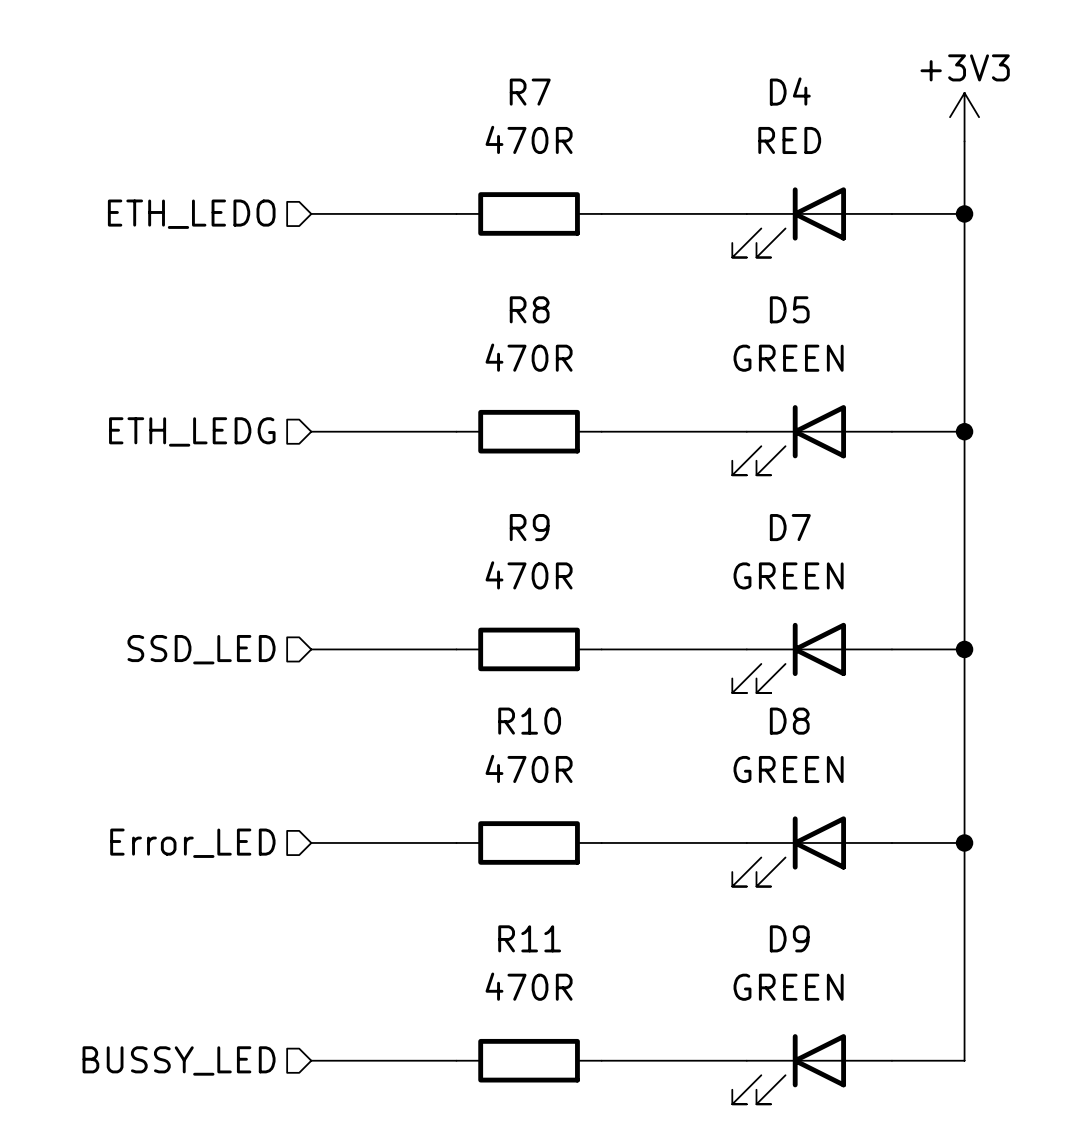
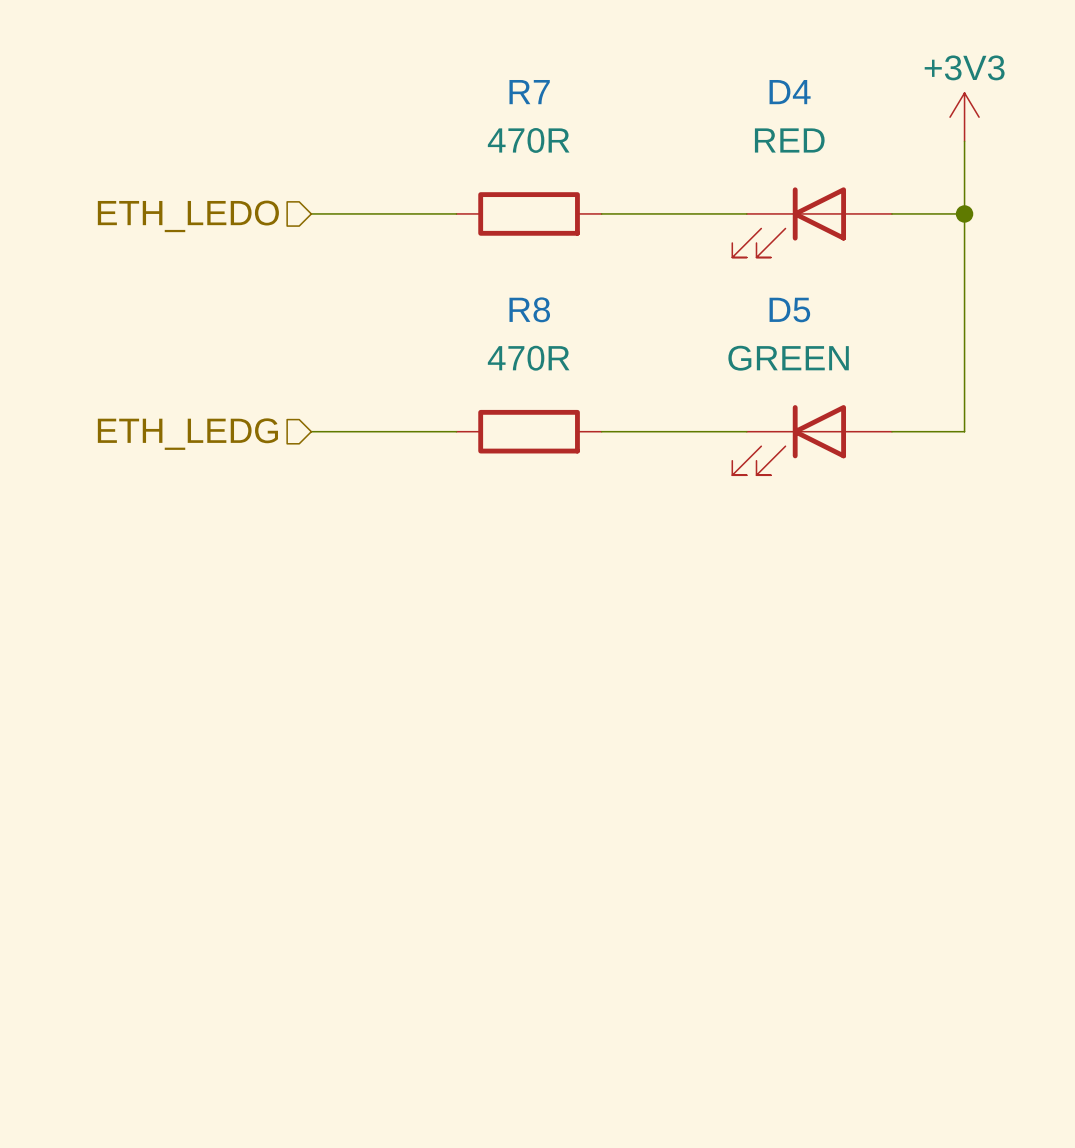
wire: (964, 431) (964, 1060) (891, 1060) -> none
junction: (964, 431) -> none
hierarchical label: SSD_LED (201, 649) -> none
wire: (311, 649) (456, 649) -> none
R9: 470R (529, 649) -> none
wire: (601, 649) (746, 649) -> none
wire: (891, 649) (964, 649) -> none
junction: (964, 649) -> none
D7: GREEN (812, 657) -> none
wire: (311, 842) (456, 842) -> none
R10: 470R (529, 842) -> none
wire: (601, 842) (746, 842) -> none
wire: (891, 842) (964, 842) -> none
junction: (964, 842) -> none
hierarchical label: Error_LED (192, 843) -> none
D8: GREEN (812, 851) -> none
hierarchical label: BUSSY_LED (179, 1060) -> none
wire: (311, 1060) (456, 1060) -> none
R11: 470R (529, 1060) -> none
wire: (601, 1060) (746, 1060) -> none
D9: GREEN (812, 1069) -> none

